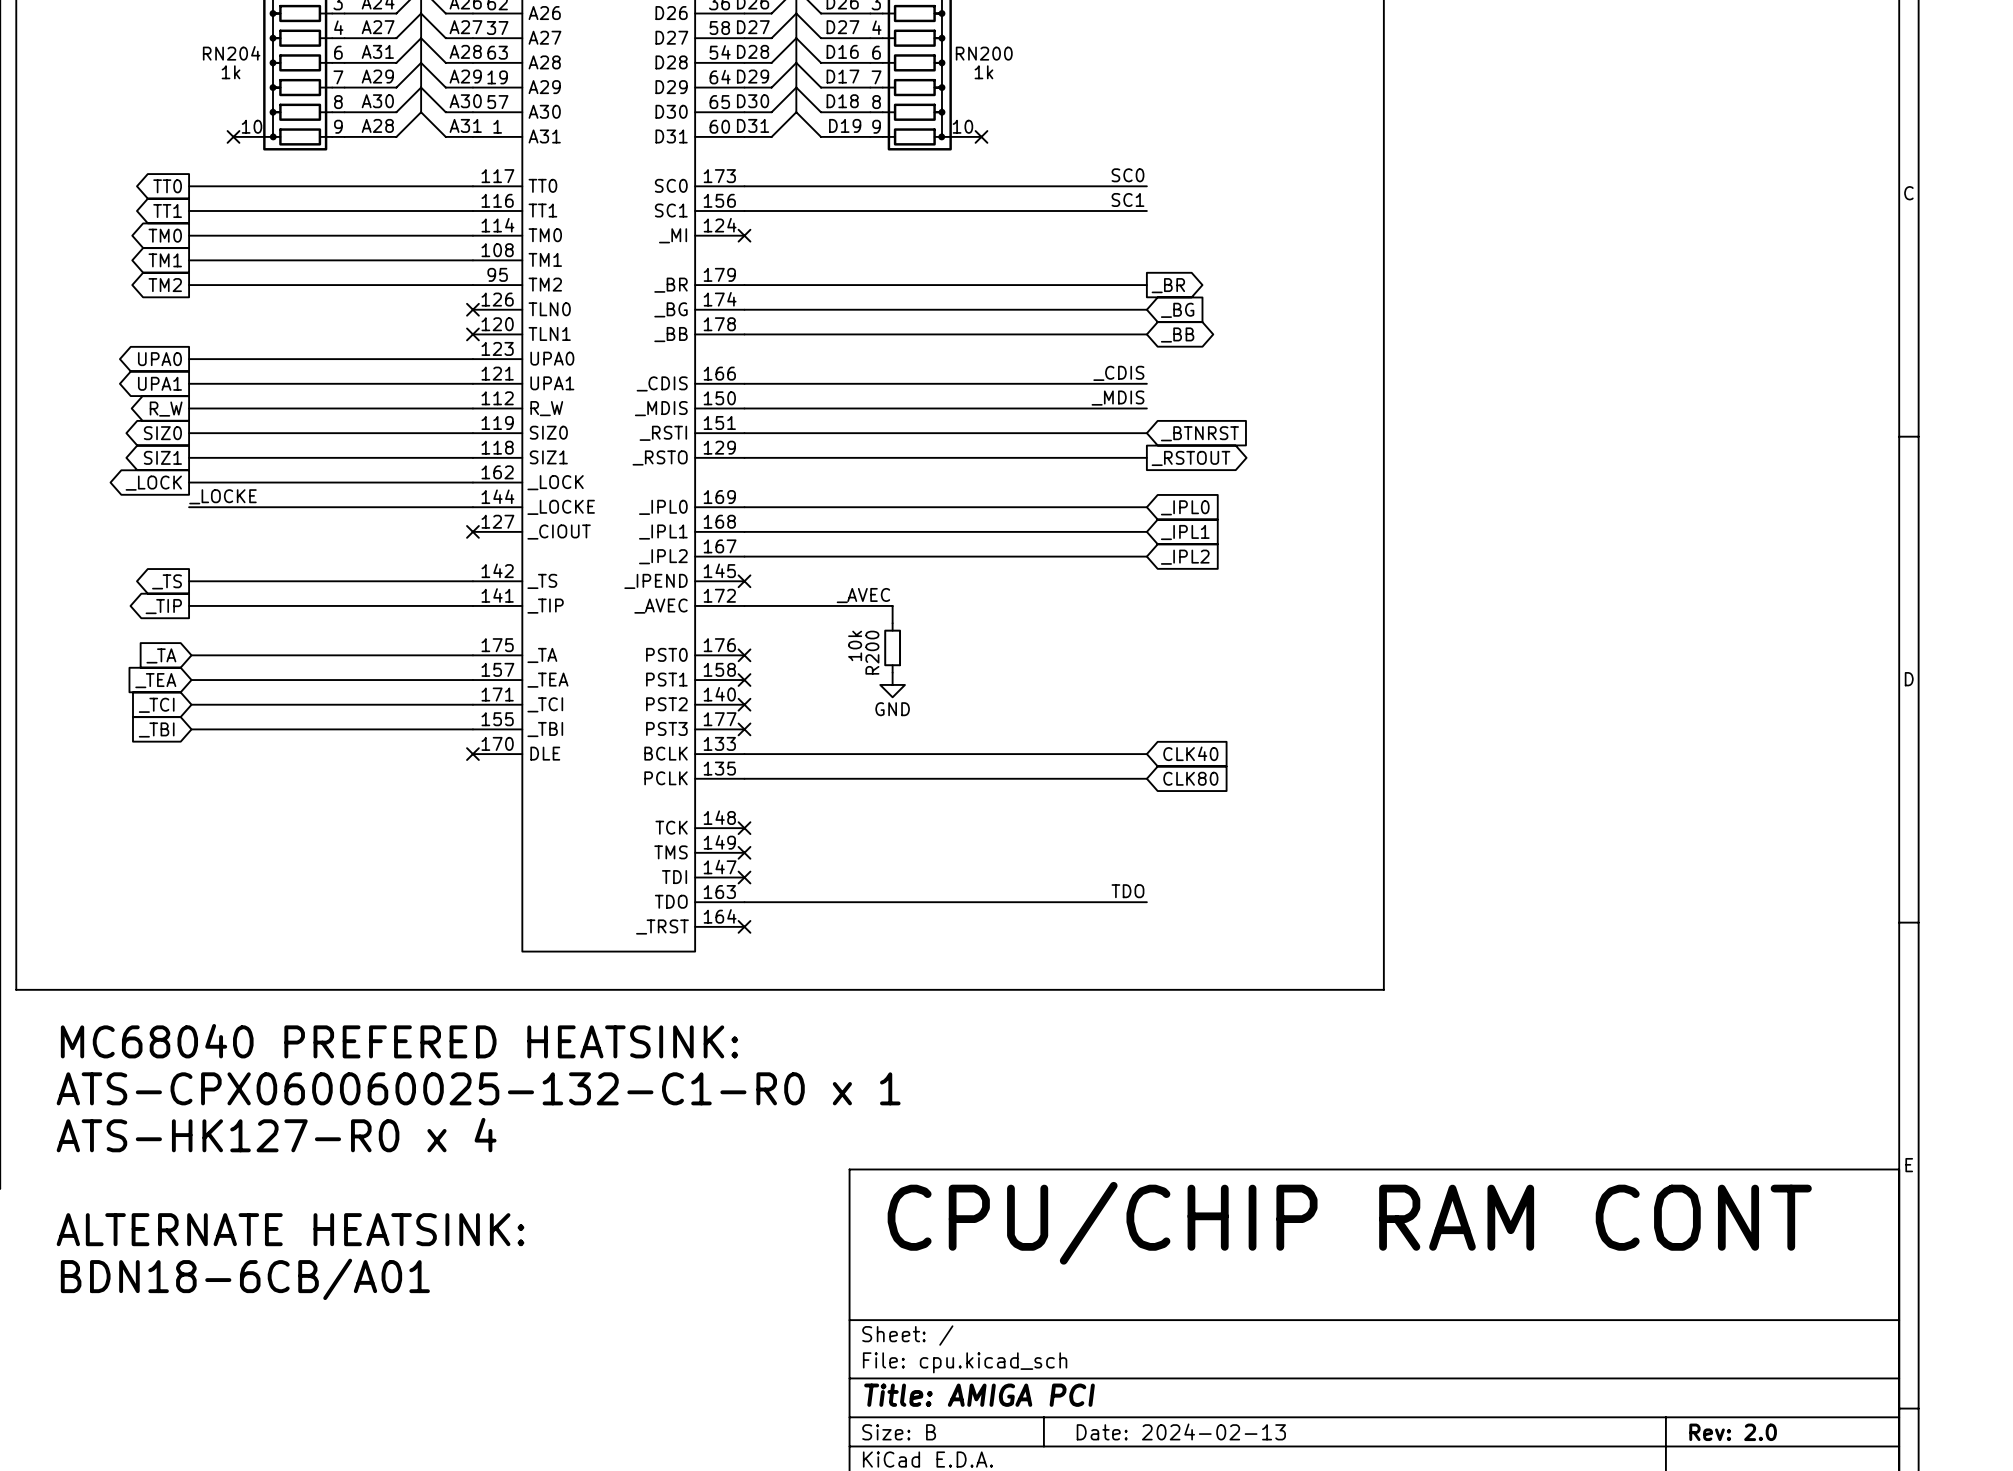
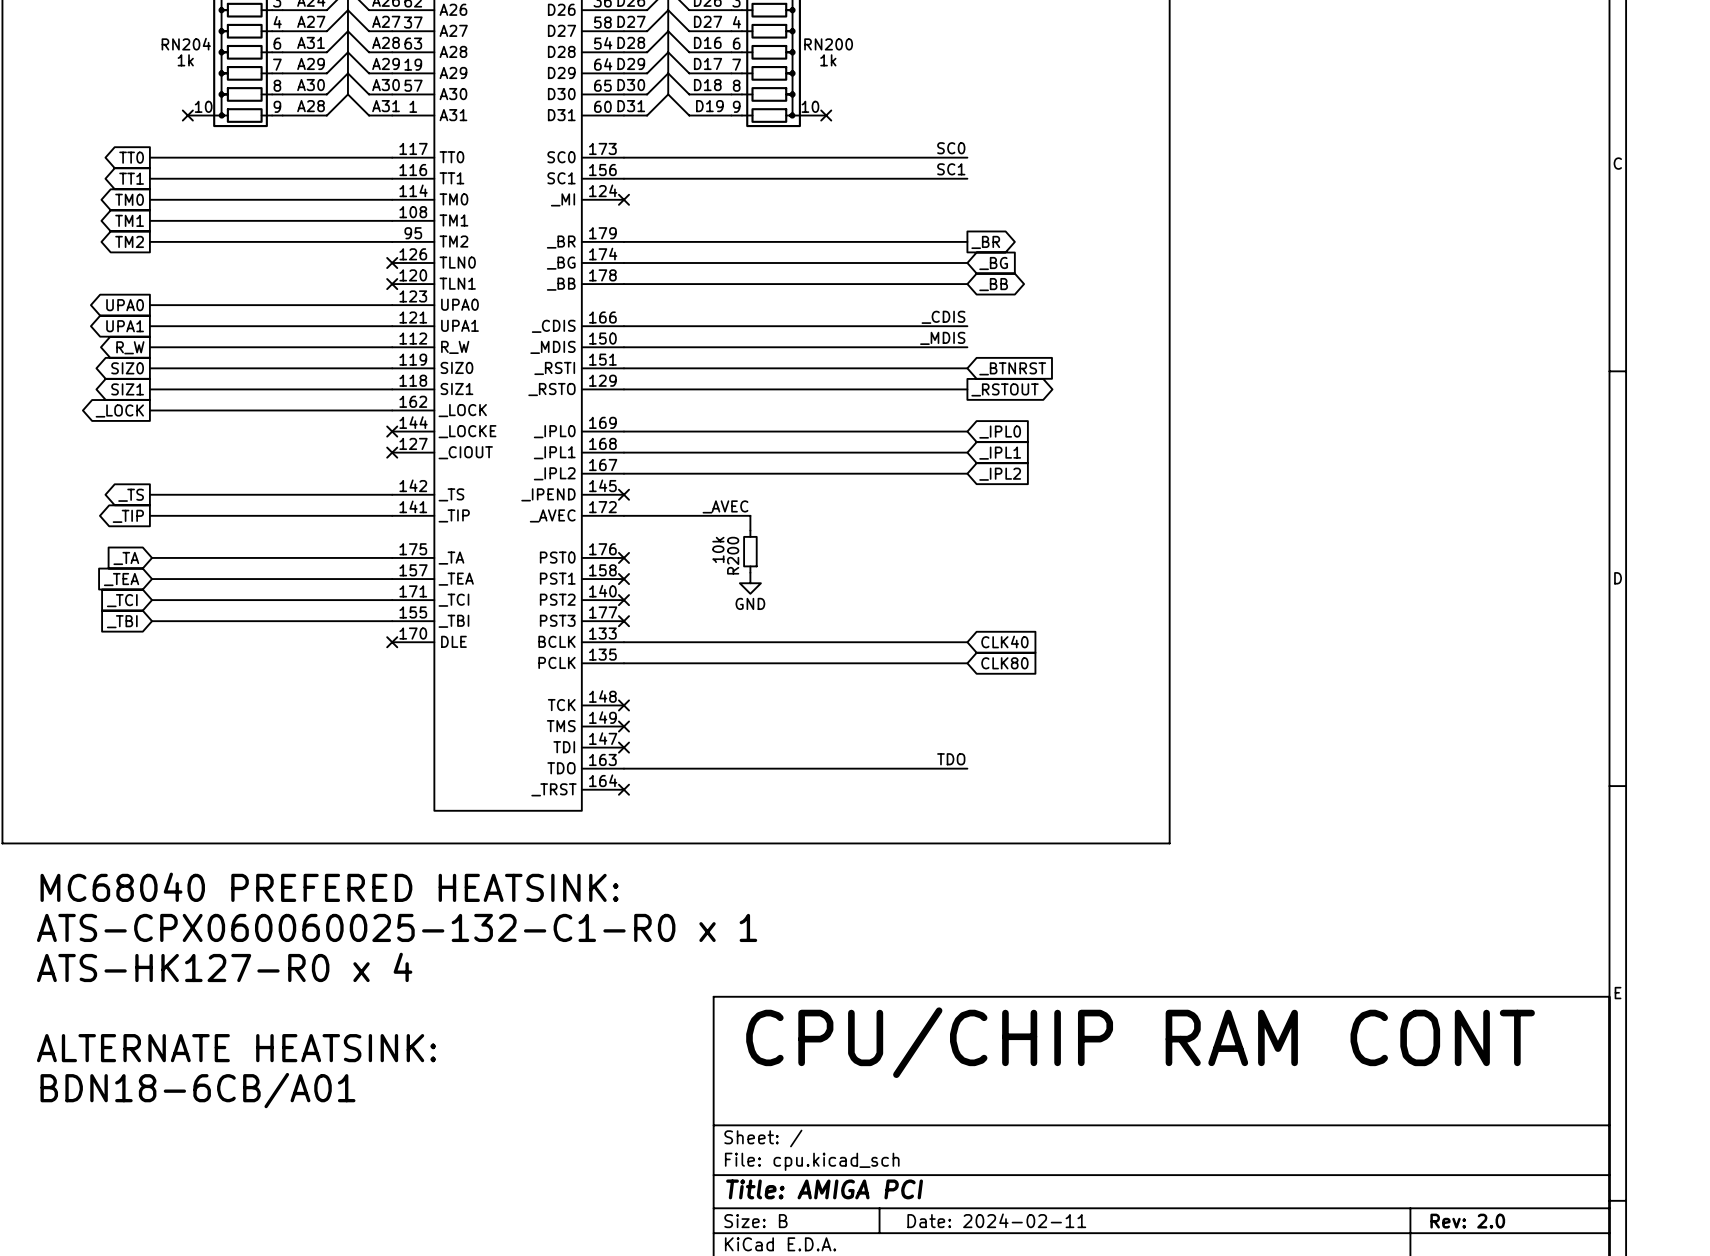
label: _LOCKE (222, 496) -> none
wire: (189, 507) (472, 507) -> none
no-connect mark: none -> (392, 431)
title block: Date: 2024-02-13 (1181, 1431) -> Date: 2024-02-11 (996, 1220)

